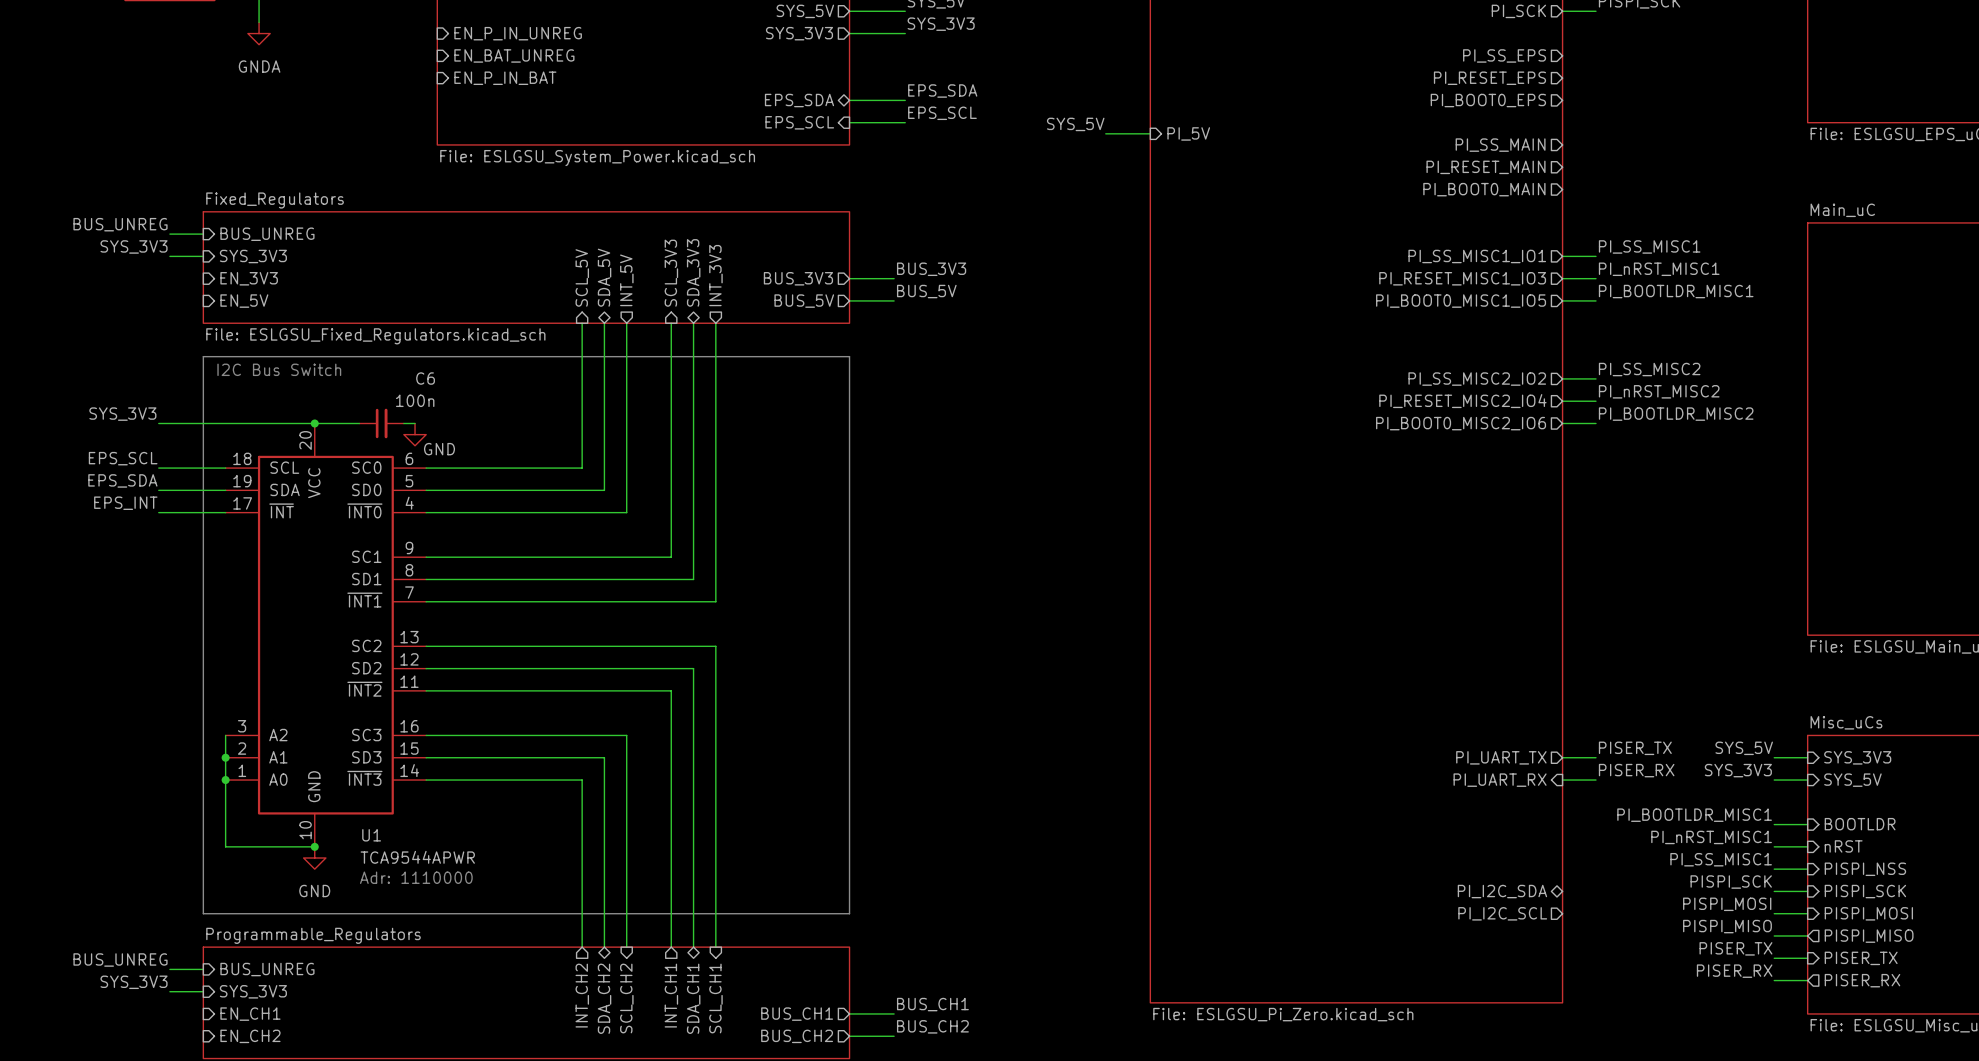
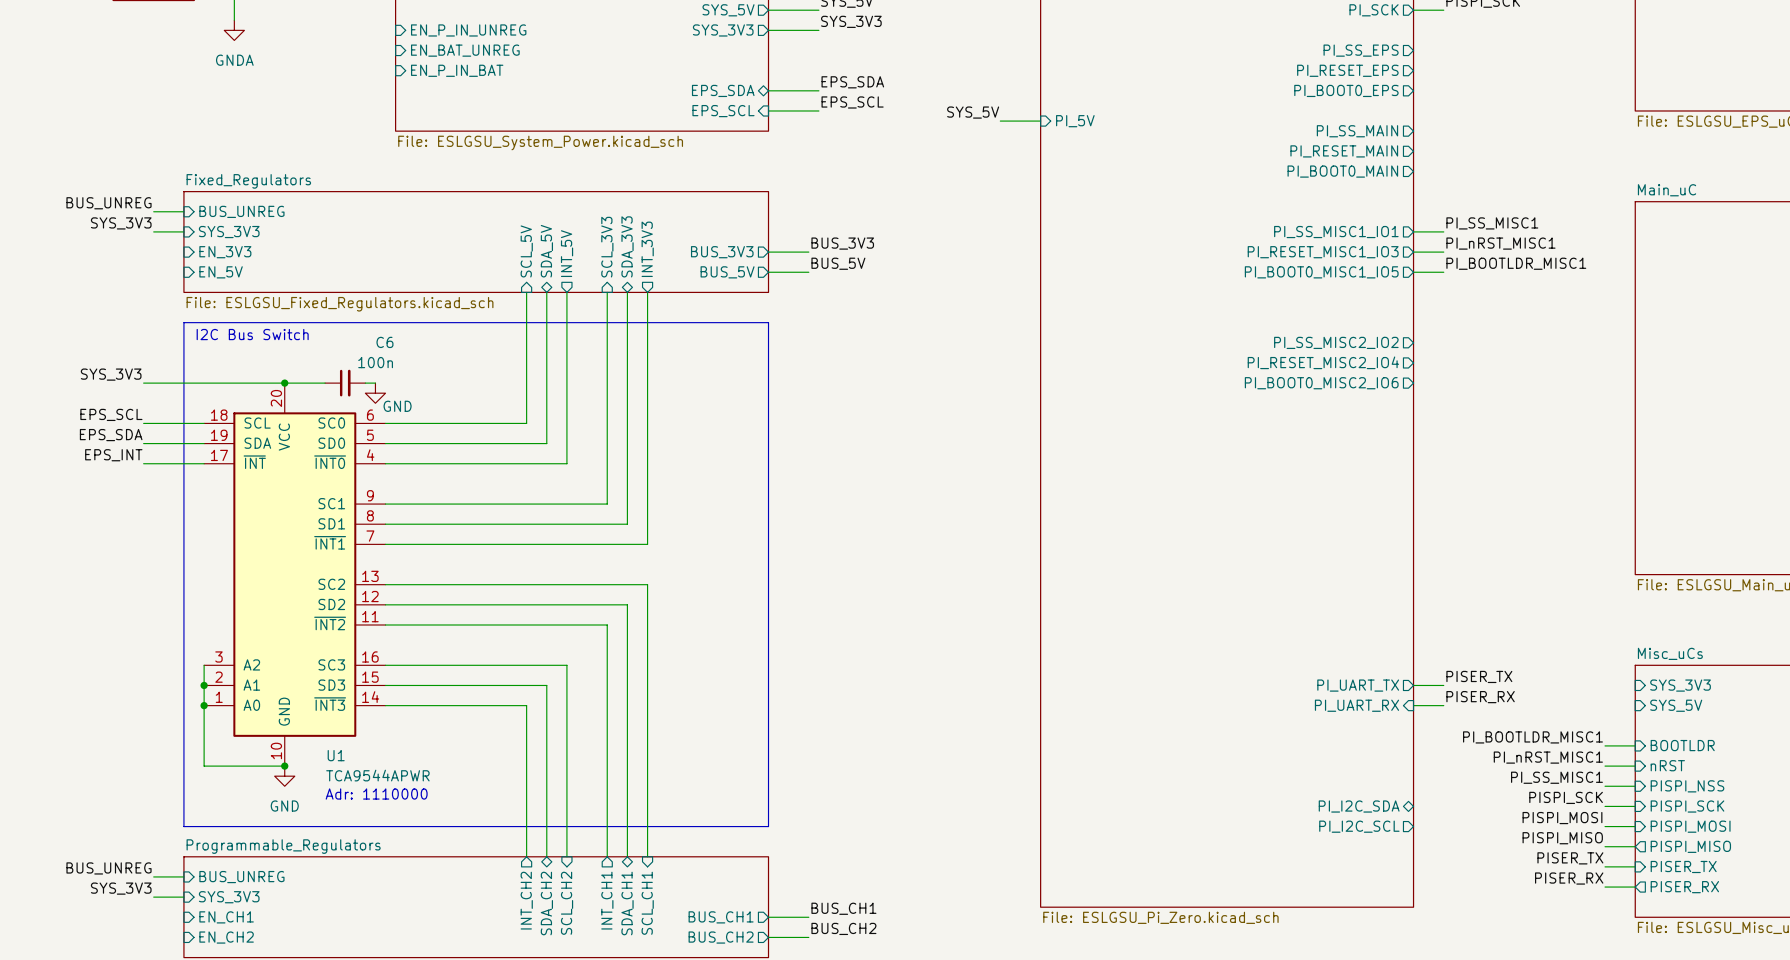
label: PI_SS_MISC2 (1649, 369) -> none
wire: (1562, 378) (1595, 378) -> none
label: PI_nRST_MISC2 (1659, 391) -> none
wire: (1562, 401) (1595, 401) -> none
label: PI_BOOTLDR_MISC2 (1676, 414) -> none
wire: (1562, 423) (1595, 423) -> none
label: SYS_5V (1744, 748) -> none
wire: (1774, 757) (1807, 757) -> none
label: SYS_3V3 (1738, 770) -> none
wire: (1774, 780) (1807, 780) -> none

